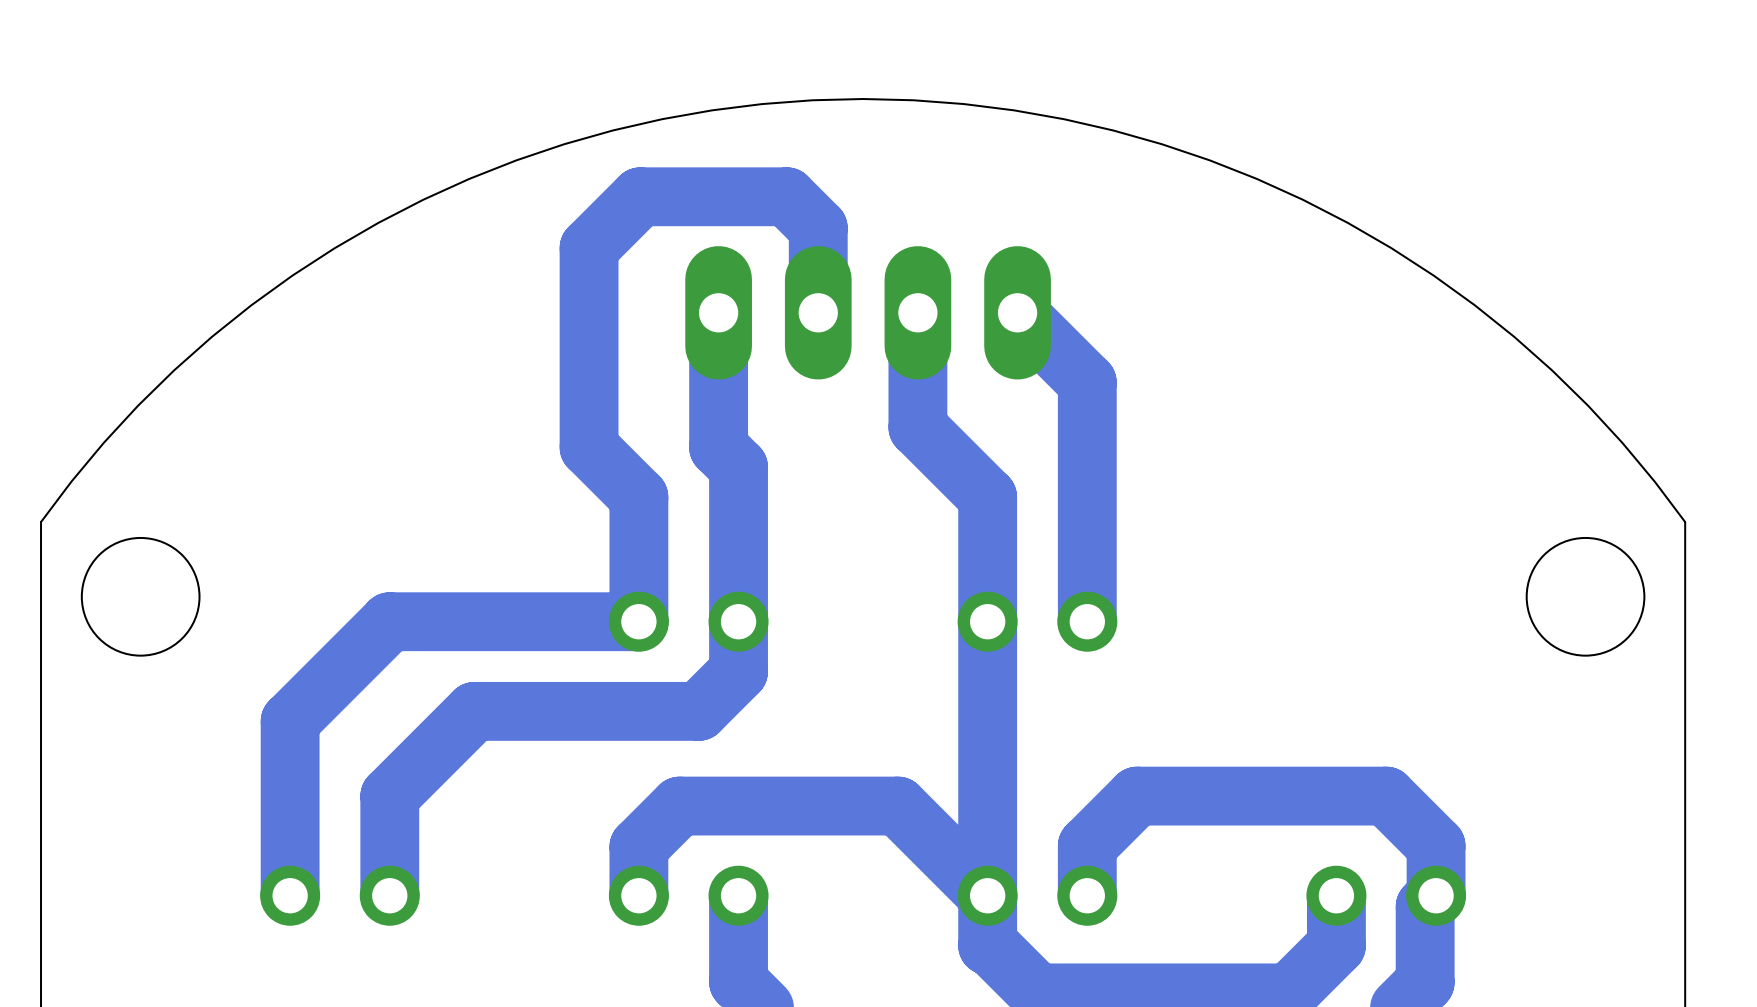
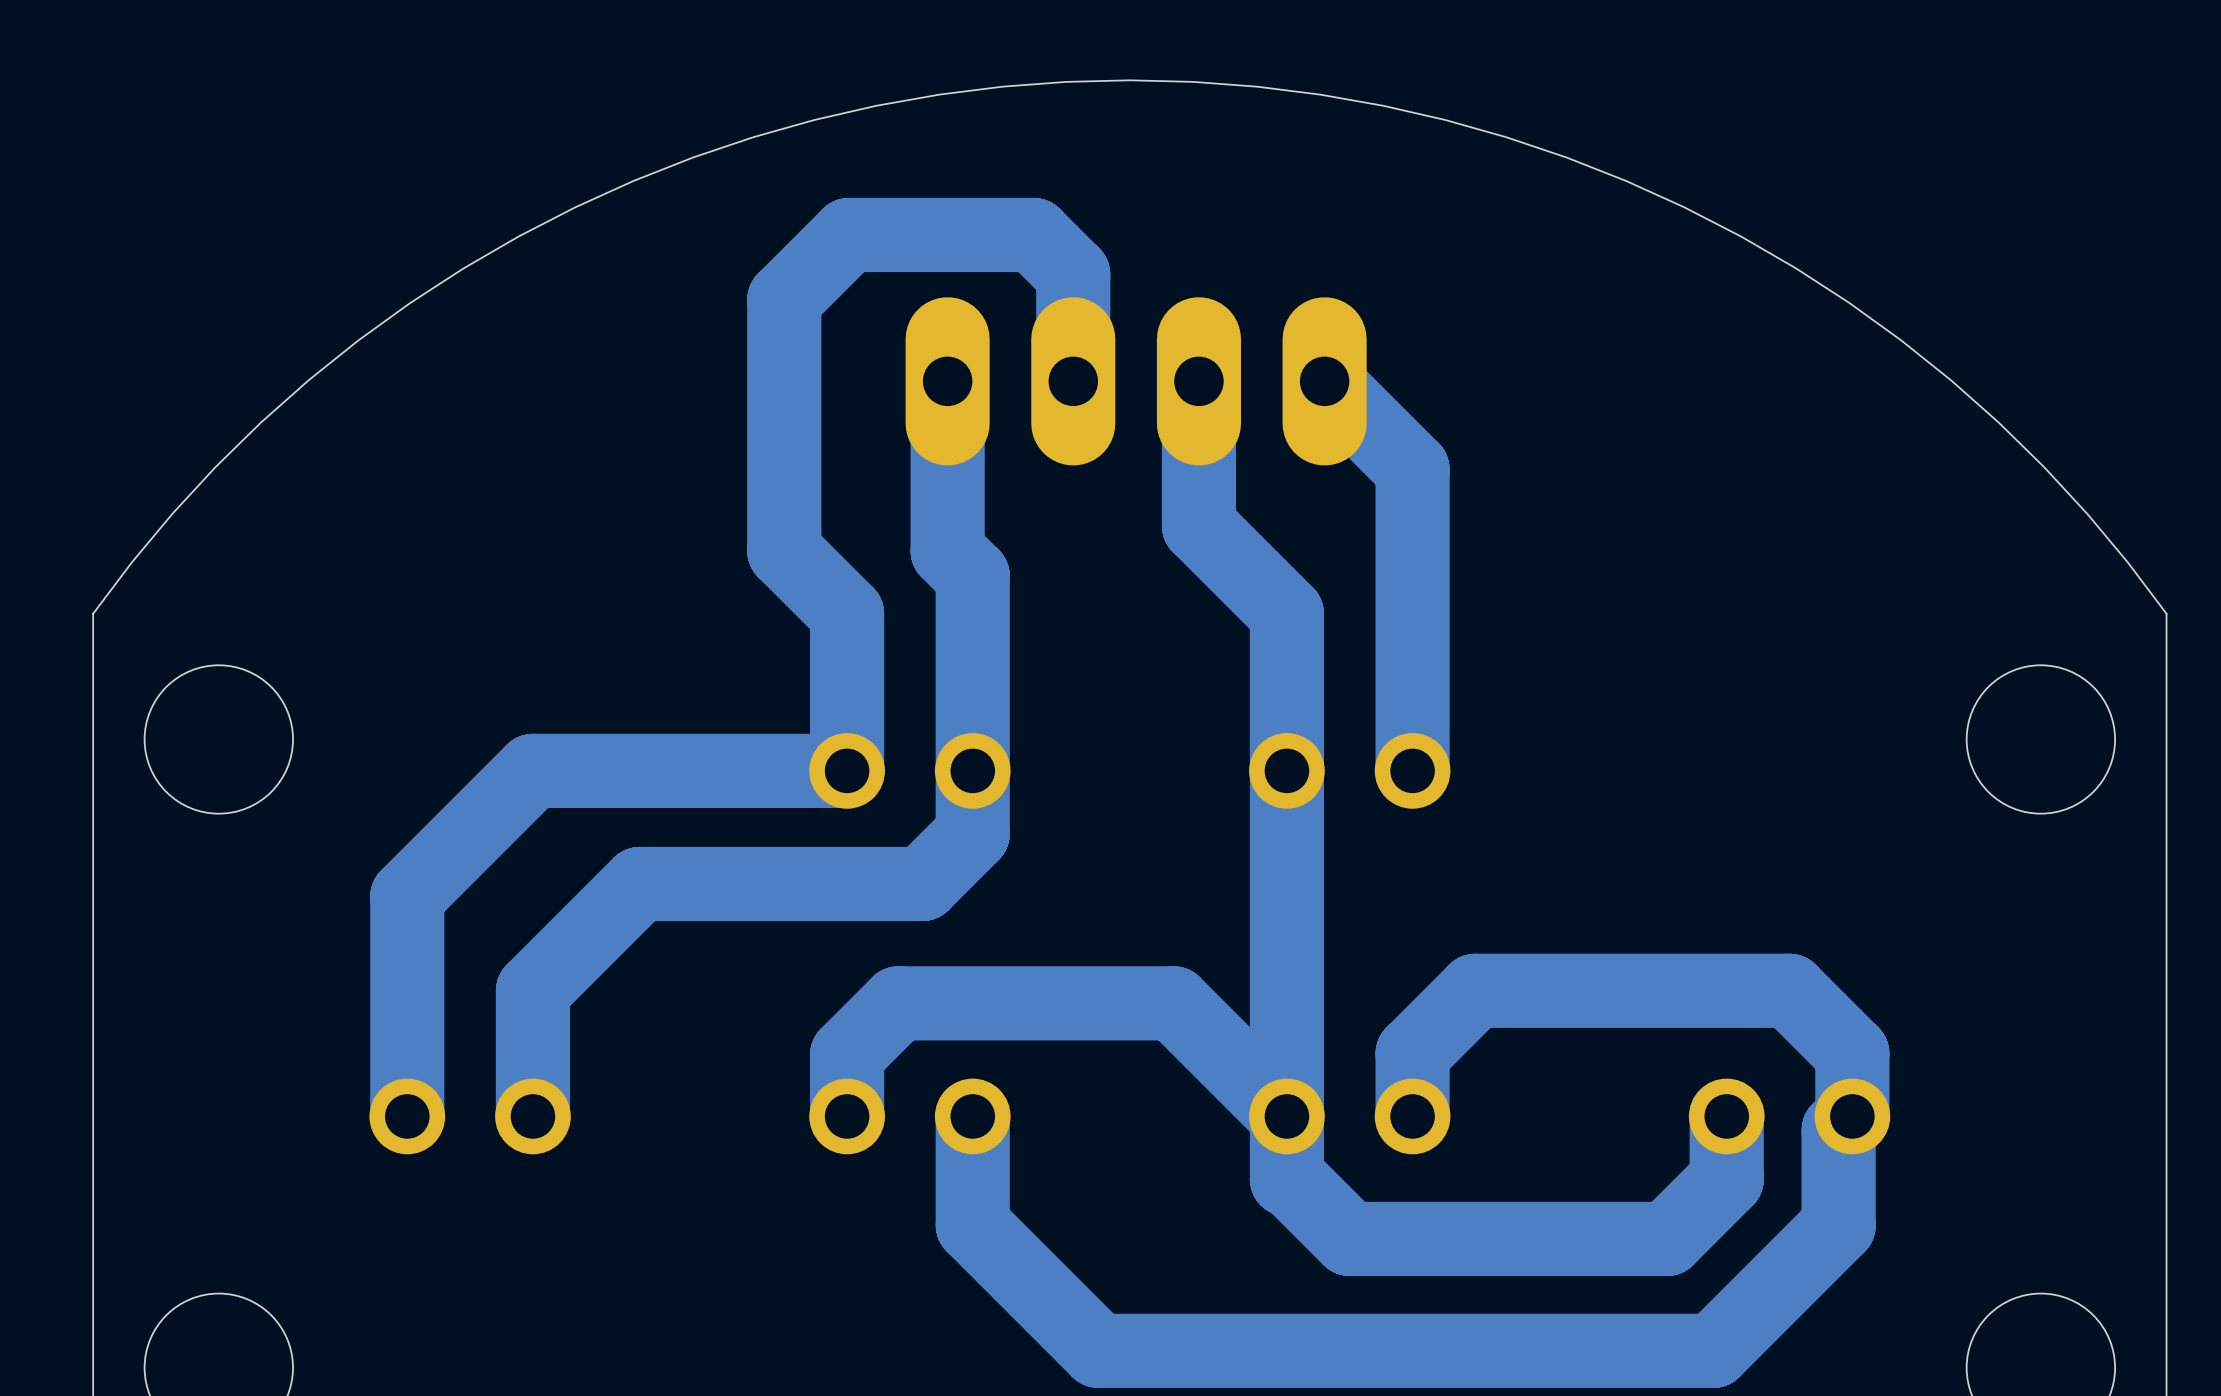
board edge: (1685, 522) (1654, 481) (1588, 405) (1514, 336) (1433, 275) (1391, 248) (1302, 199) (1209, 160) (1113, 130) (1063, 119) (964, 104) (863, 99) (762, 104) (662, 119) (613, 130) (516, 160) (423, 199) (334, 248) (292, 275) (211, 336) (138, 405) (71, 481) (41, 522) -> (2166, 645) (2166, 613) (2128, 562) (2087, 513) (2044, 467) (1998, 422) (1950, 380) (1901, 340) (1849, 303) (1796, 268) (1740, 236) (1684, 207) (1626, 180) (1566, 157) (1506, 137) (1445, 119) (1383, 105) (1320, 94) (1257, 86) (1193, 81) (1129, 80) (1066, 81) (1002, 86) (939, 94) (876, 105) (814, 119) (753, 137) (692, 157) (633, 180) (575, 207) (518, 236) (463, 268) (410, 303) (358, 340) (308, 380) (261, 422) (215, 467) (172, 513) (131, 562) (93, 613) (93, 645)

